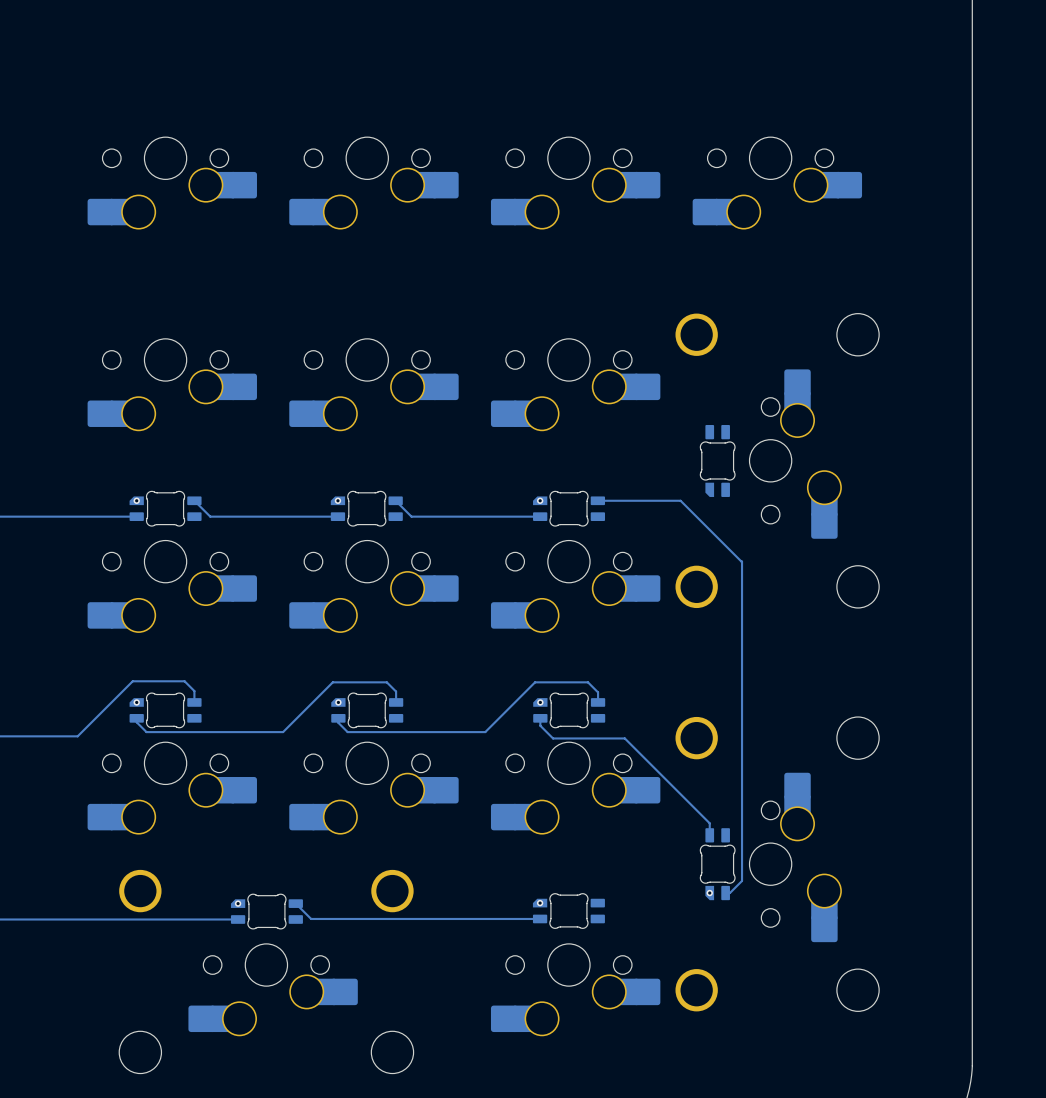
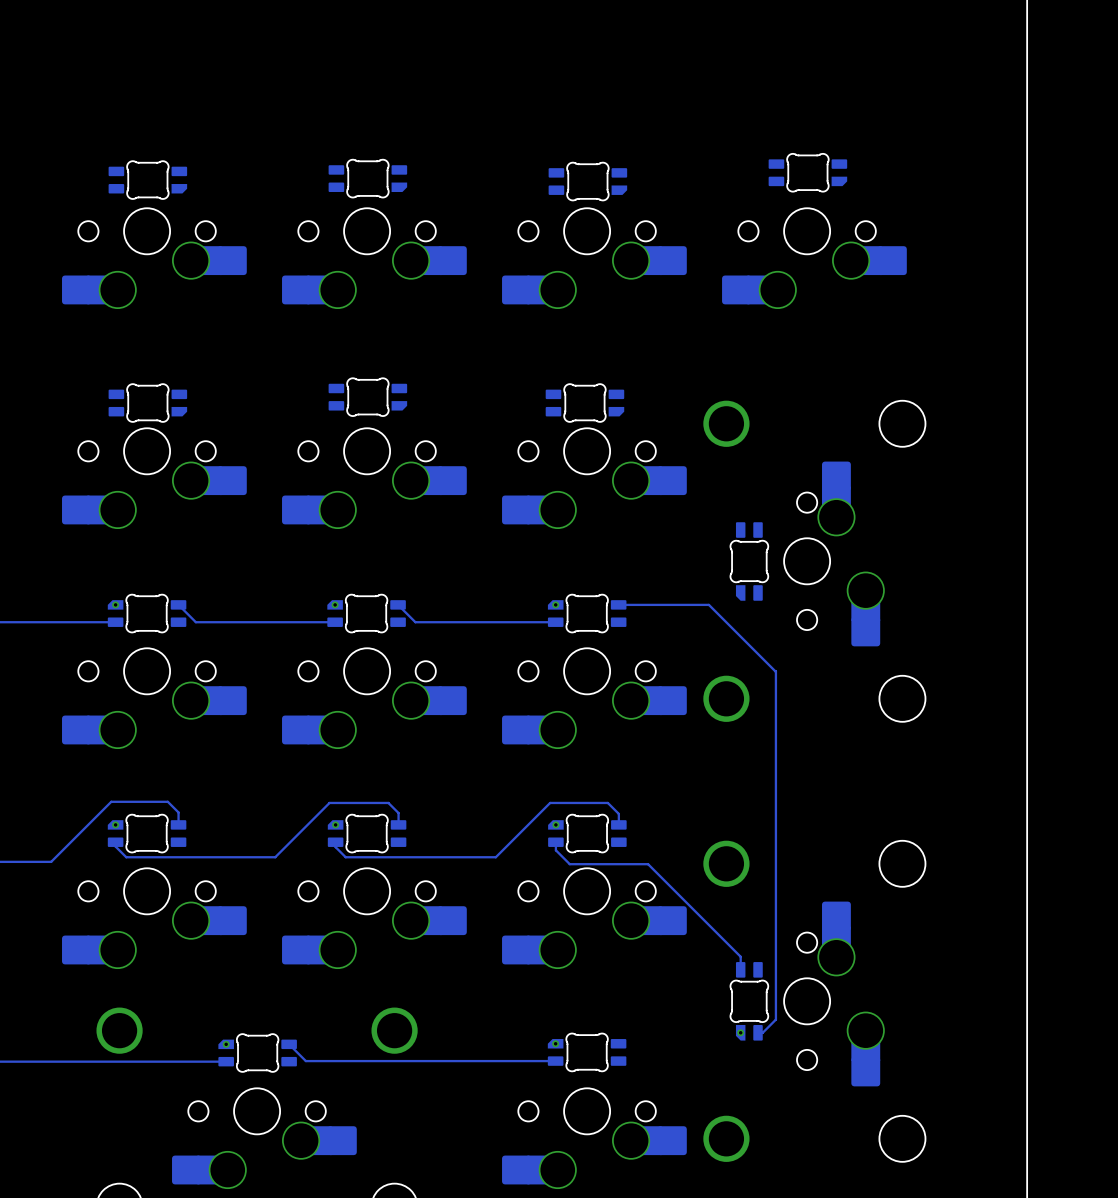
part: none -> (807, 172)
part: none -> (367, 178)
part: none -> (147, 180)
part: none -> (587, 181)
part: none -> (367, 397)
part: none -> (147, 403)
part: none -> (584, 403)

